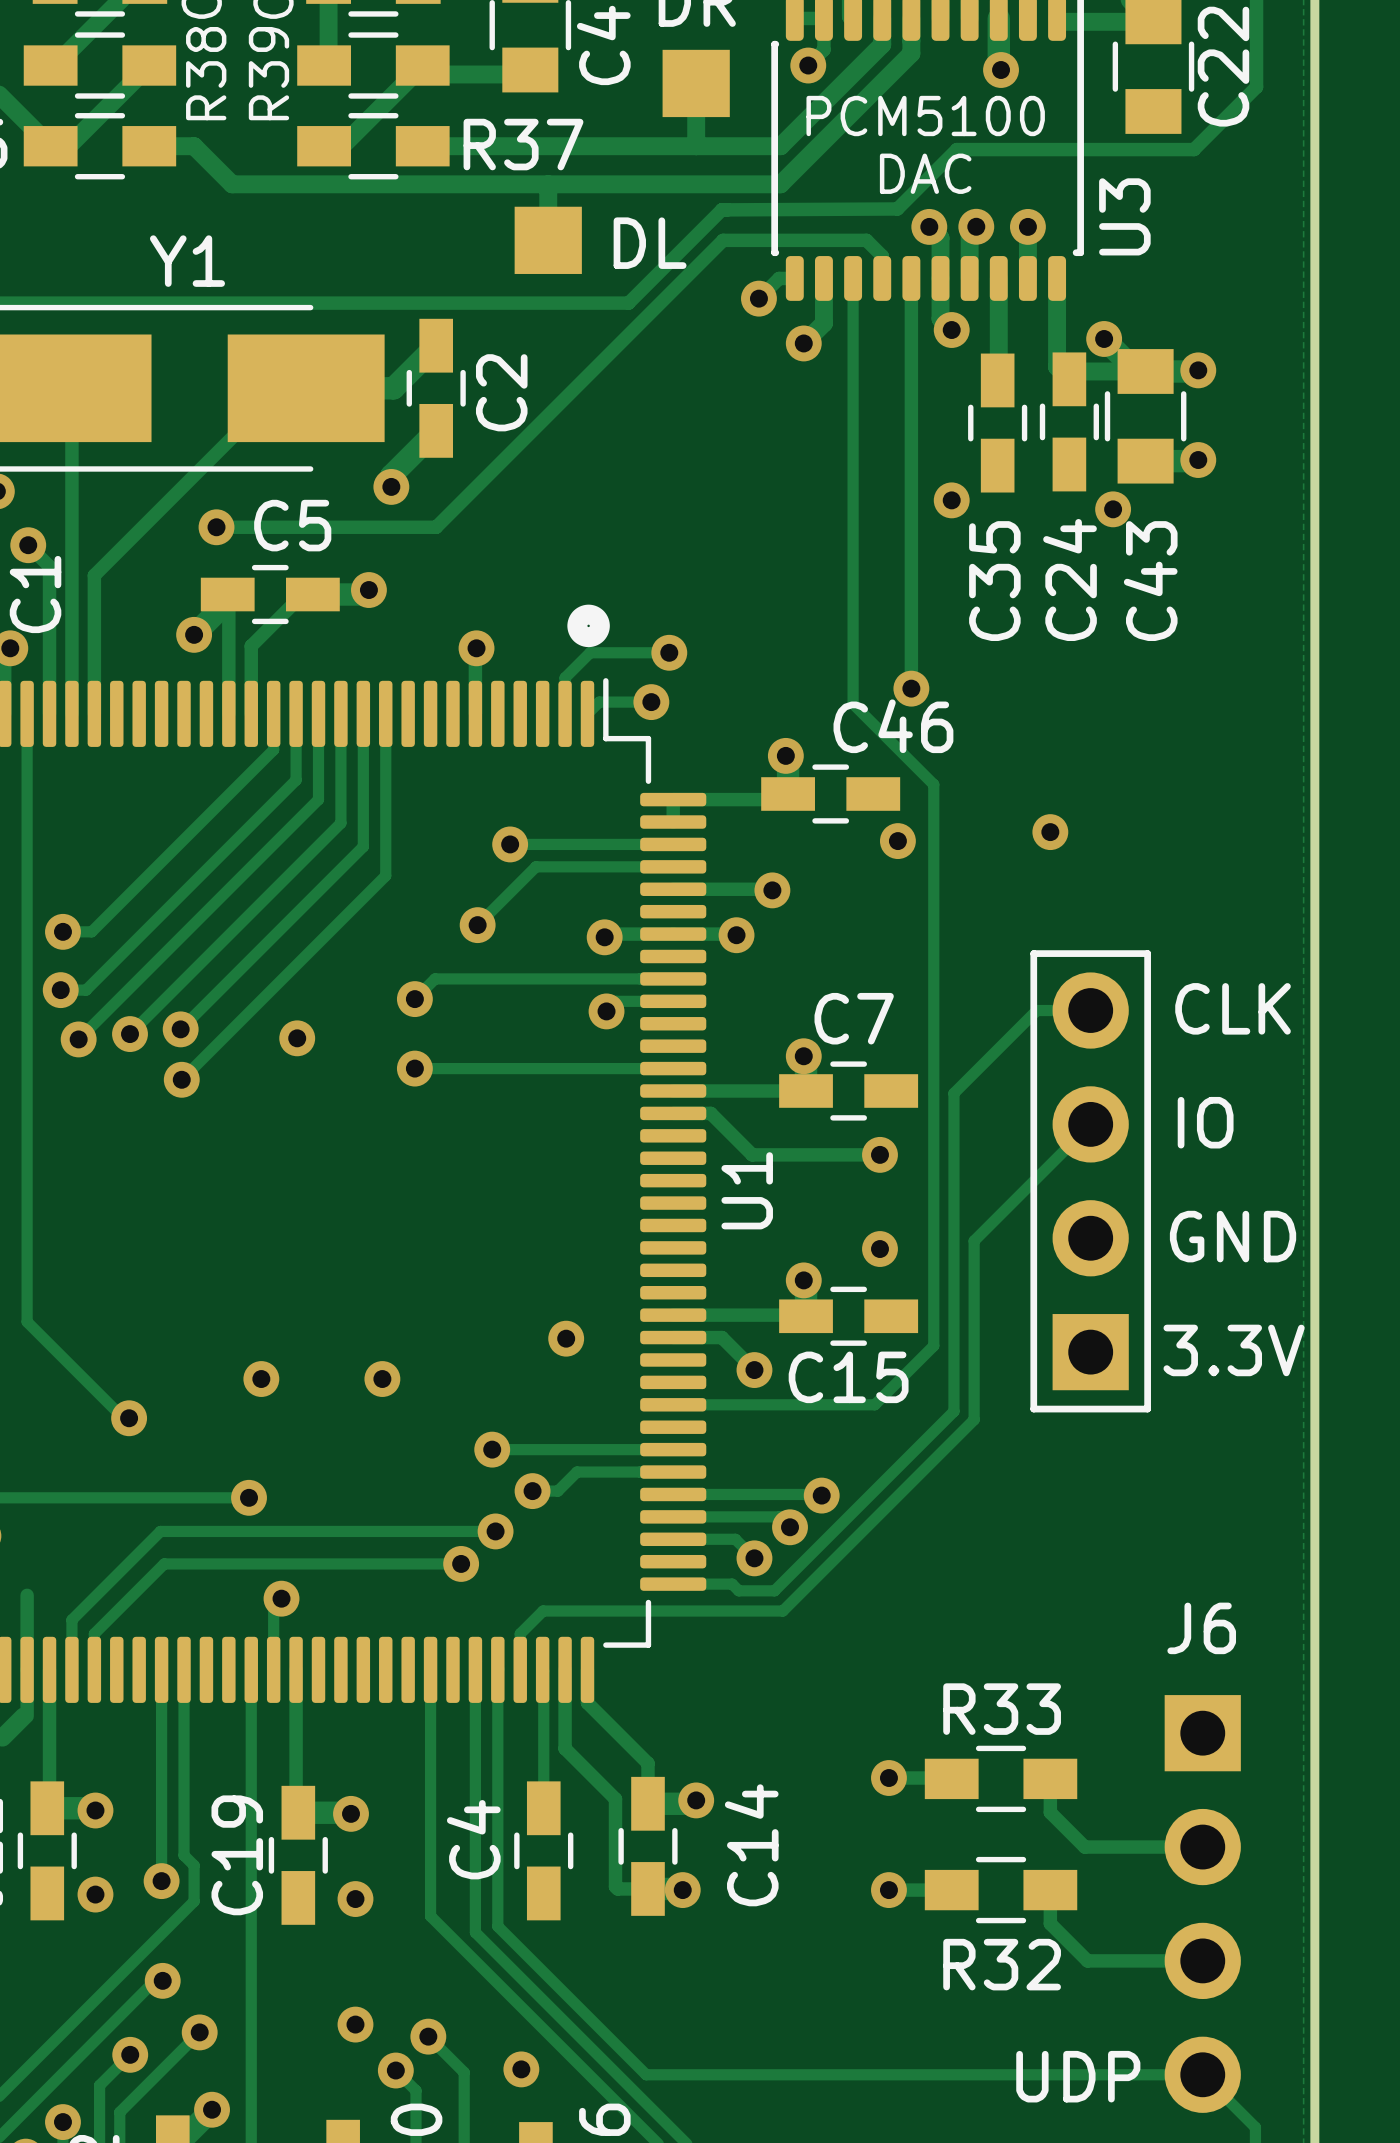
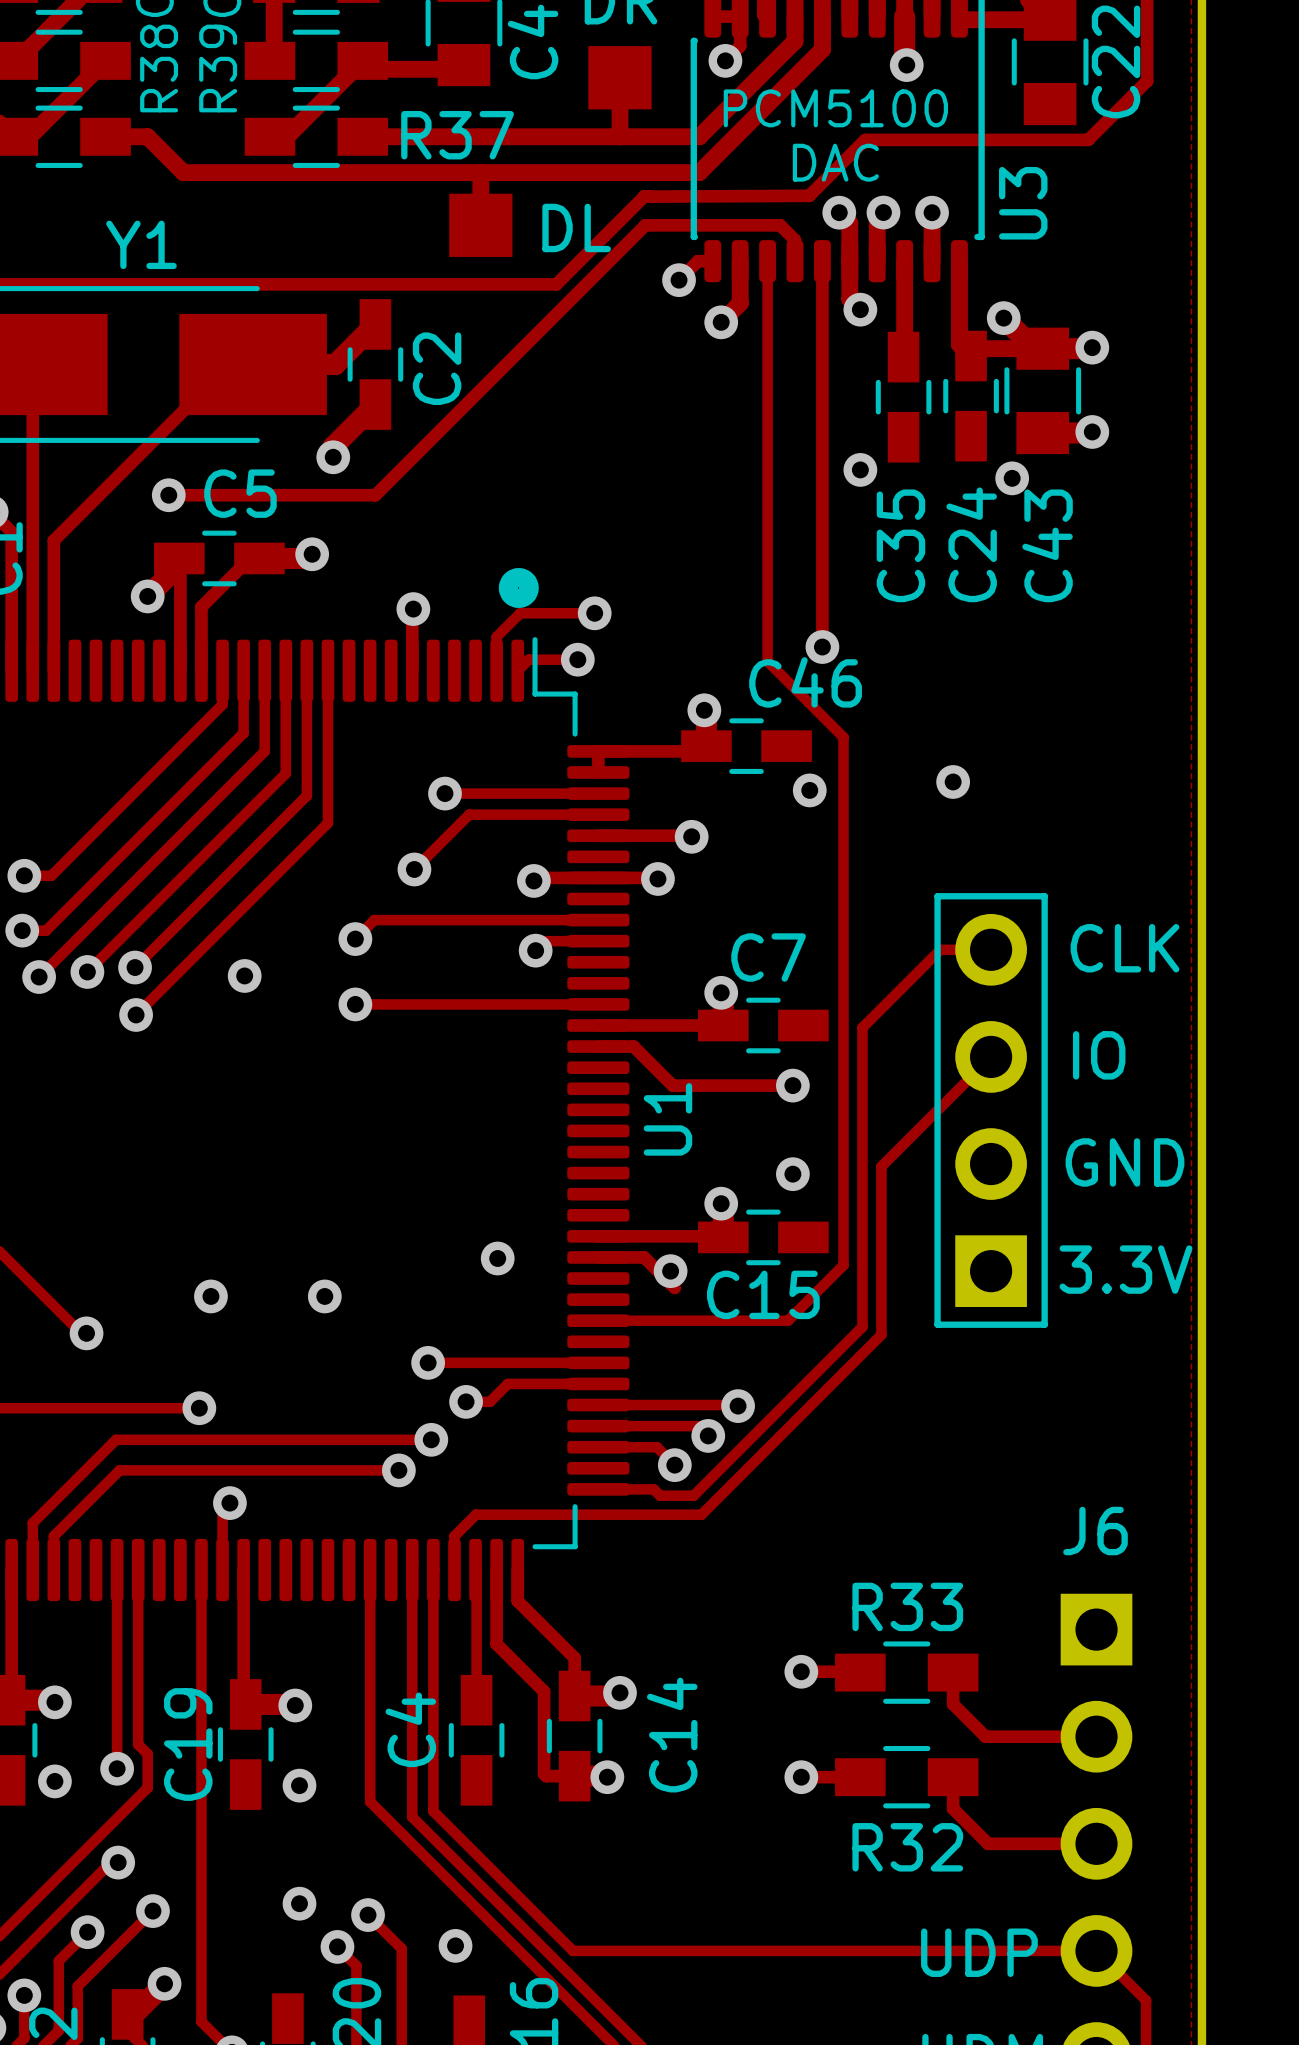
via position: (754, 1370) -> (670, 1271)

